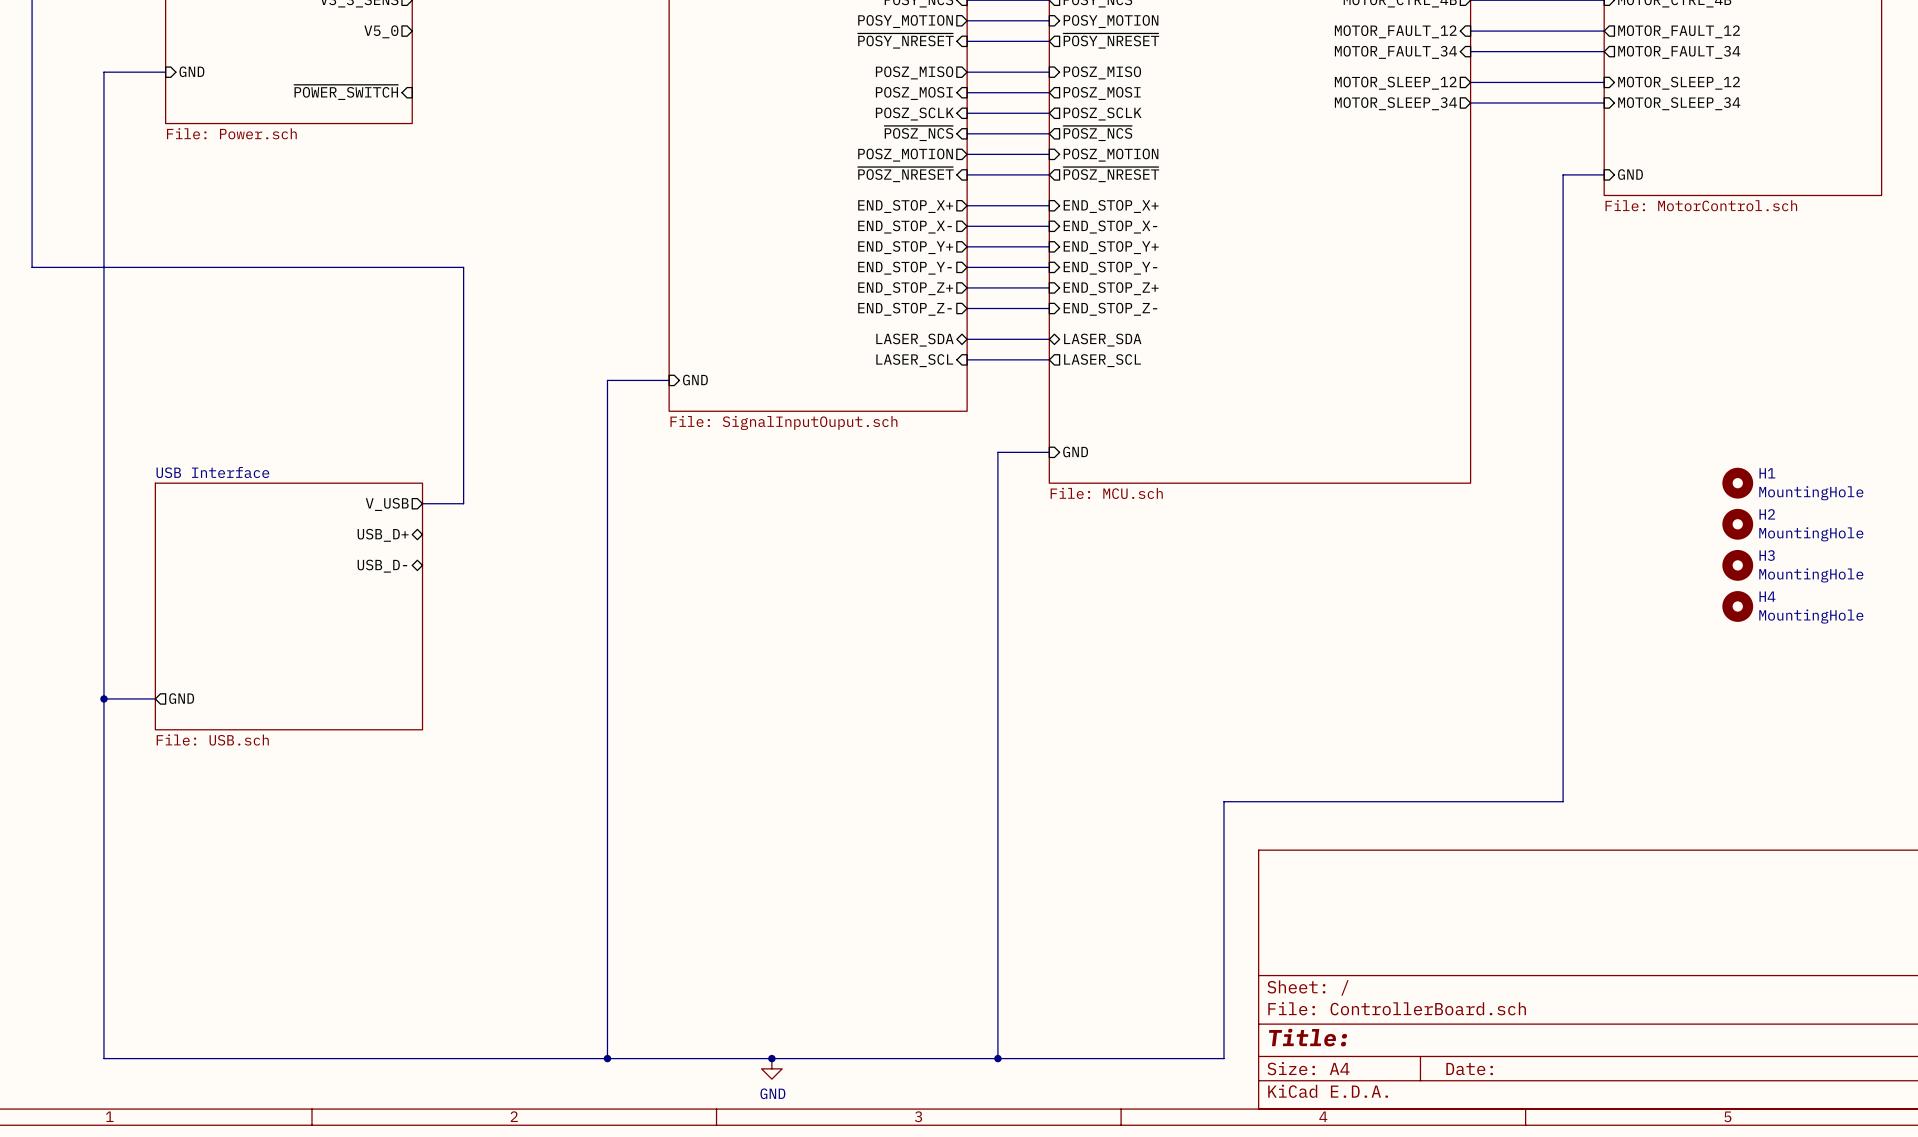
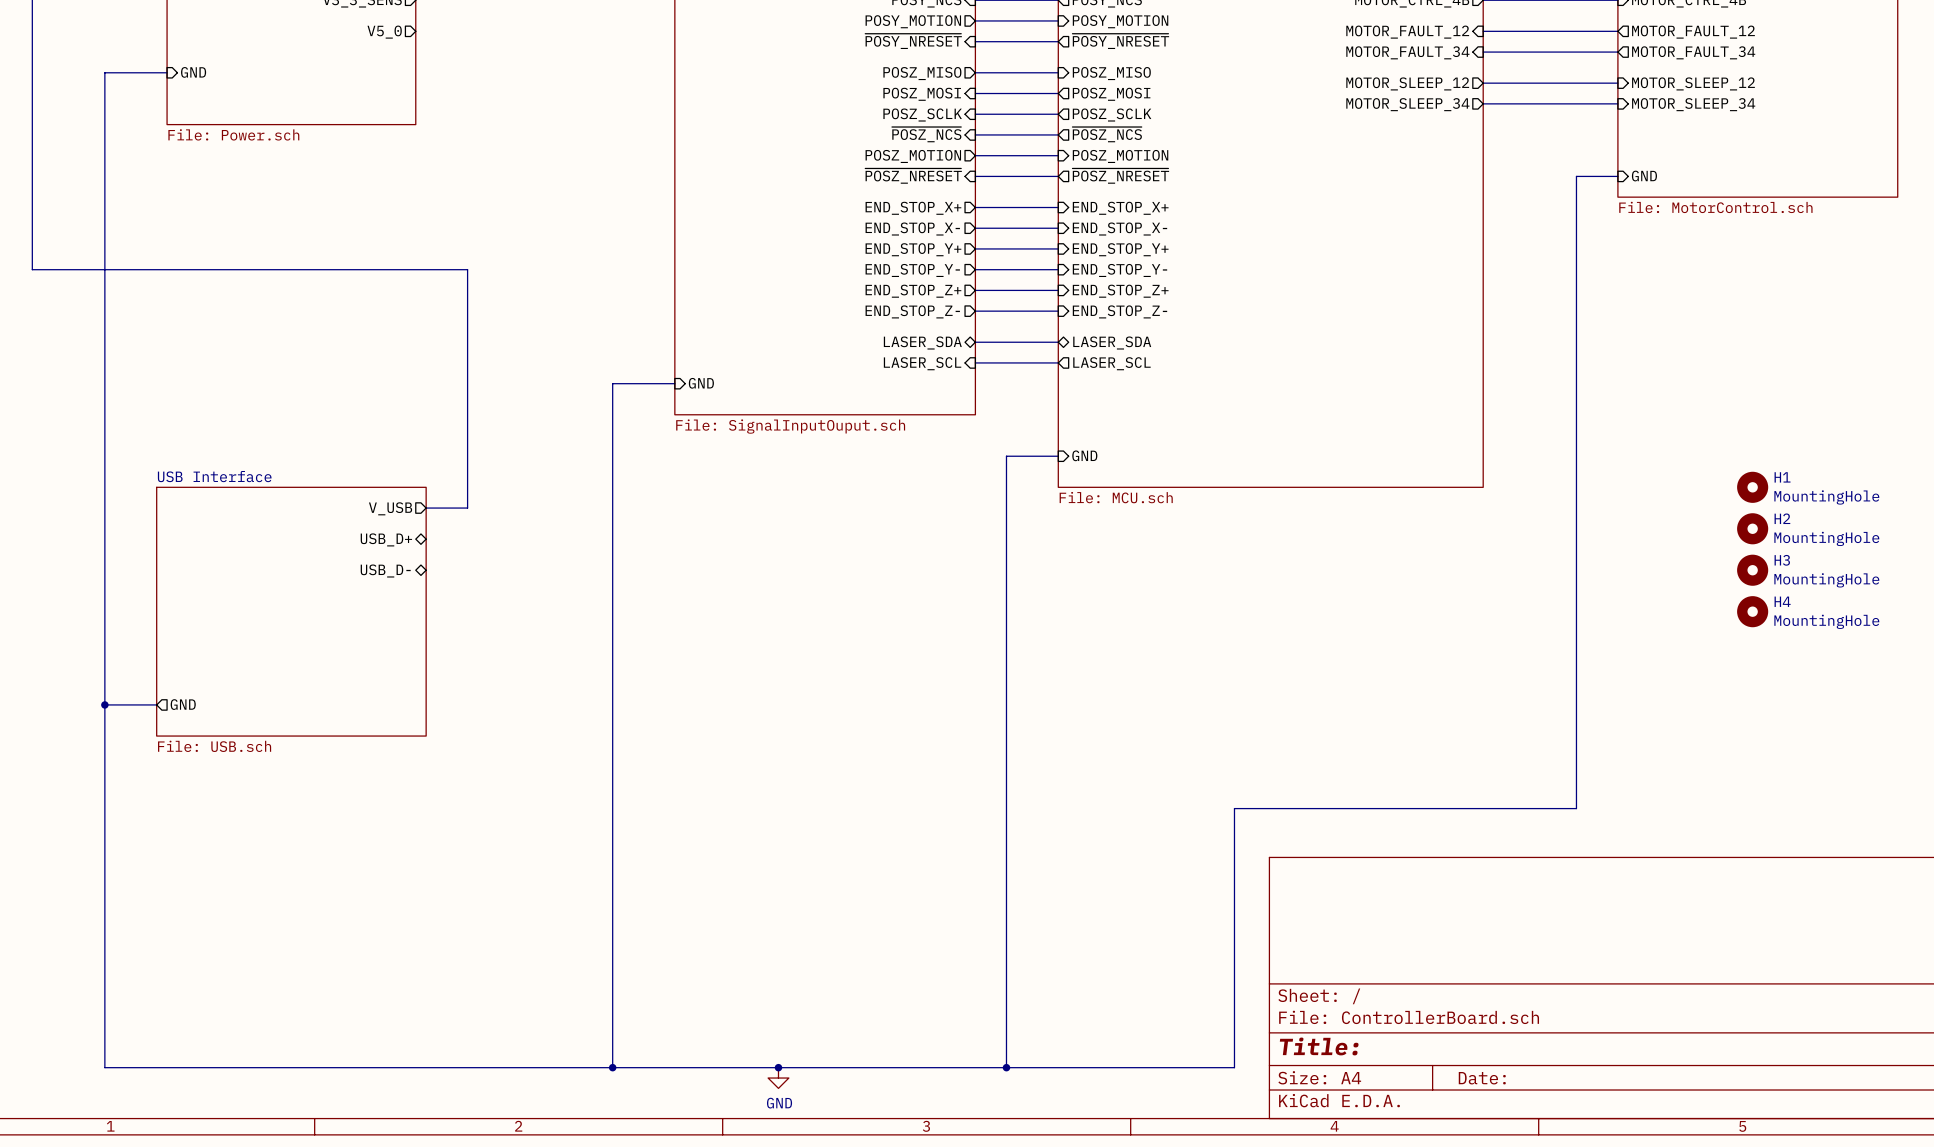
sheet pin: ~{POWER_SWITCH} (346, 92) -> none

